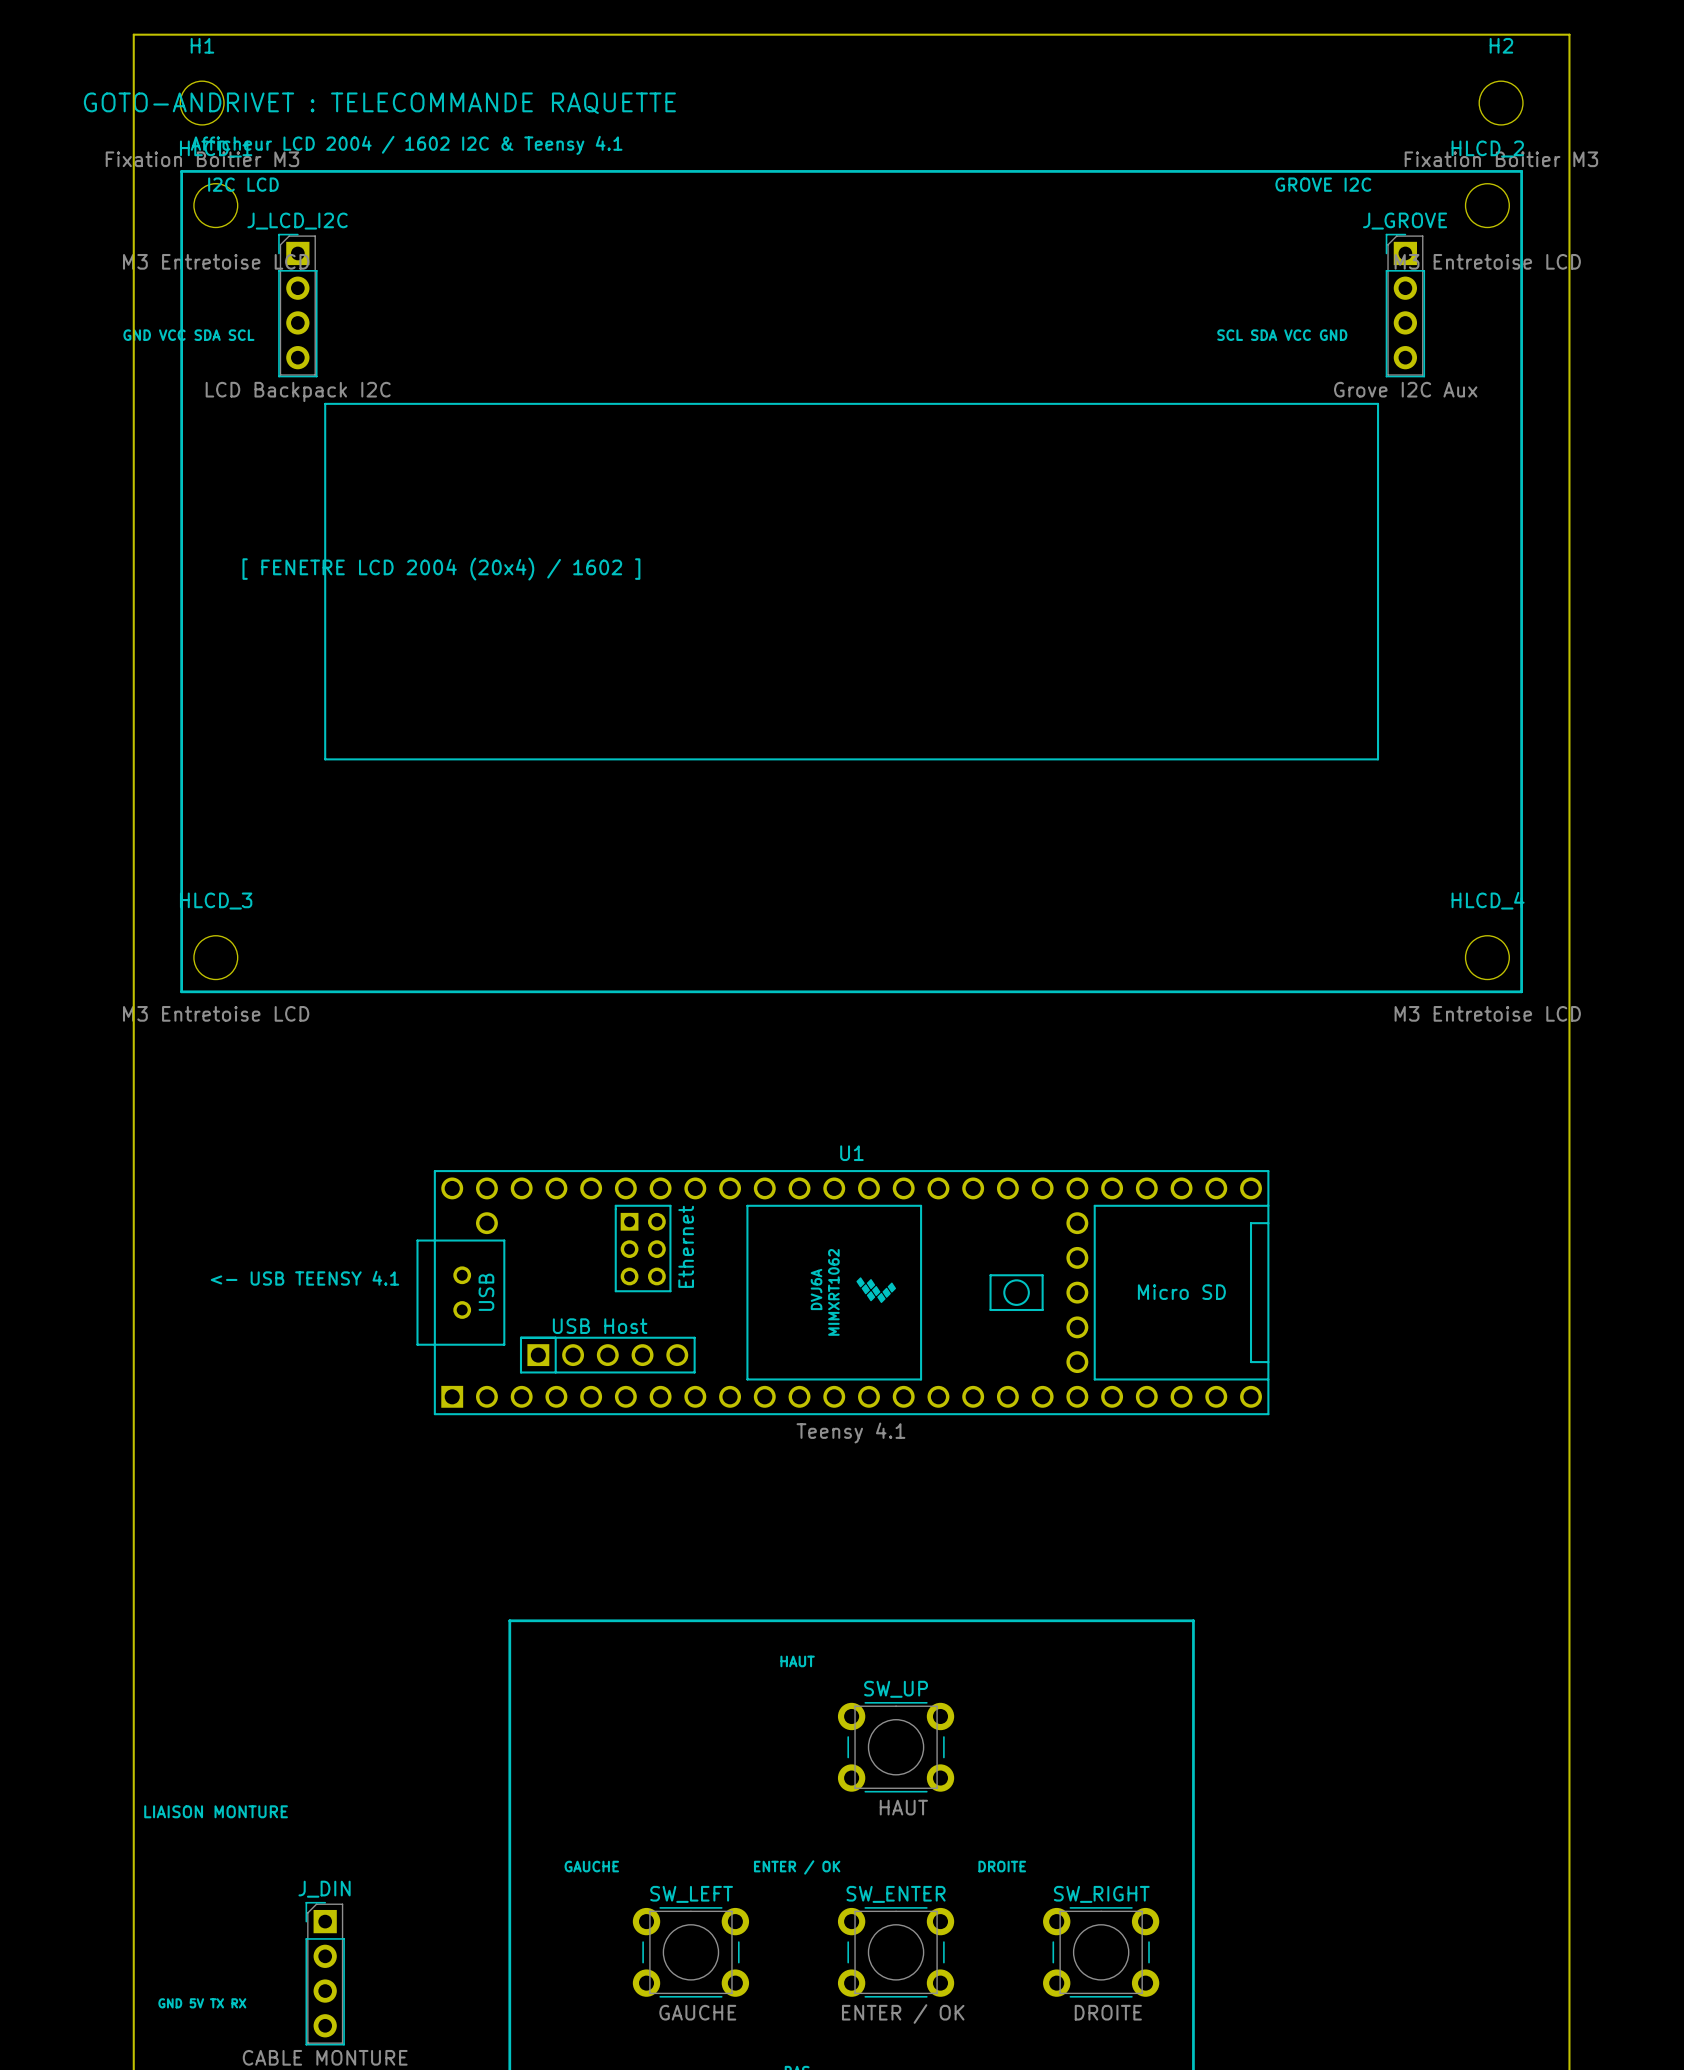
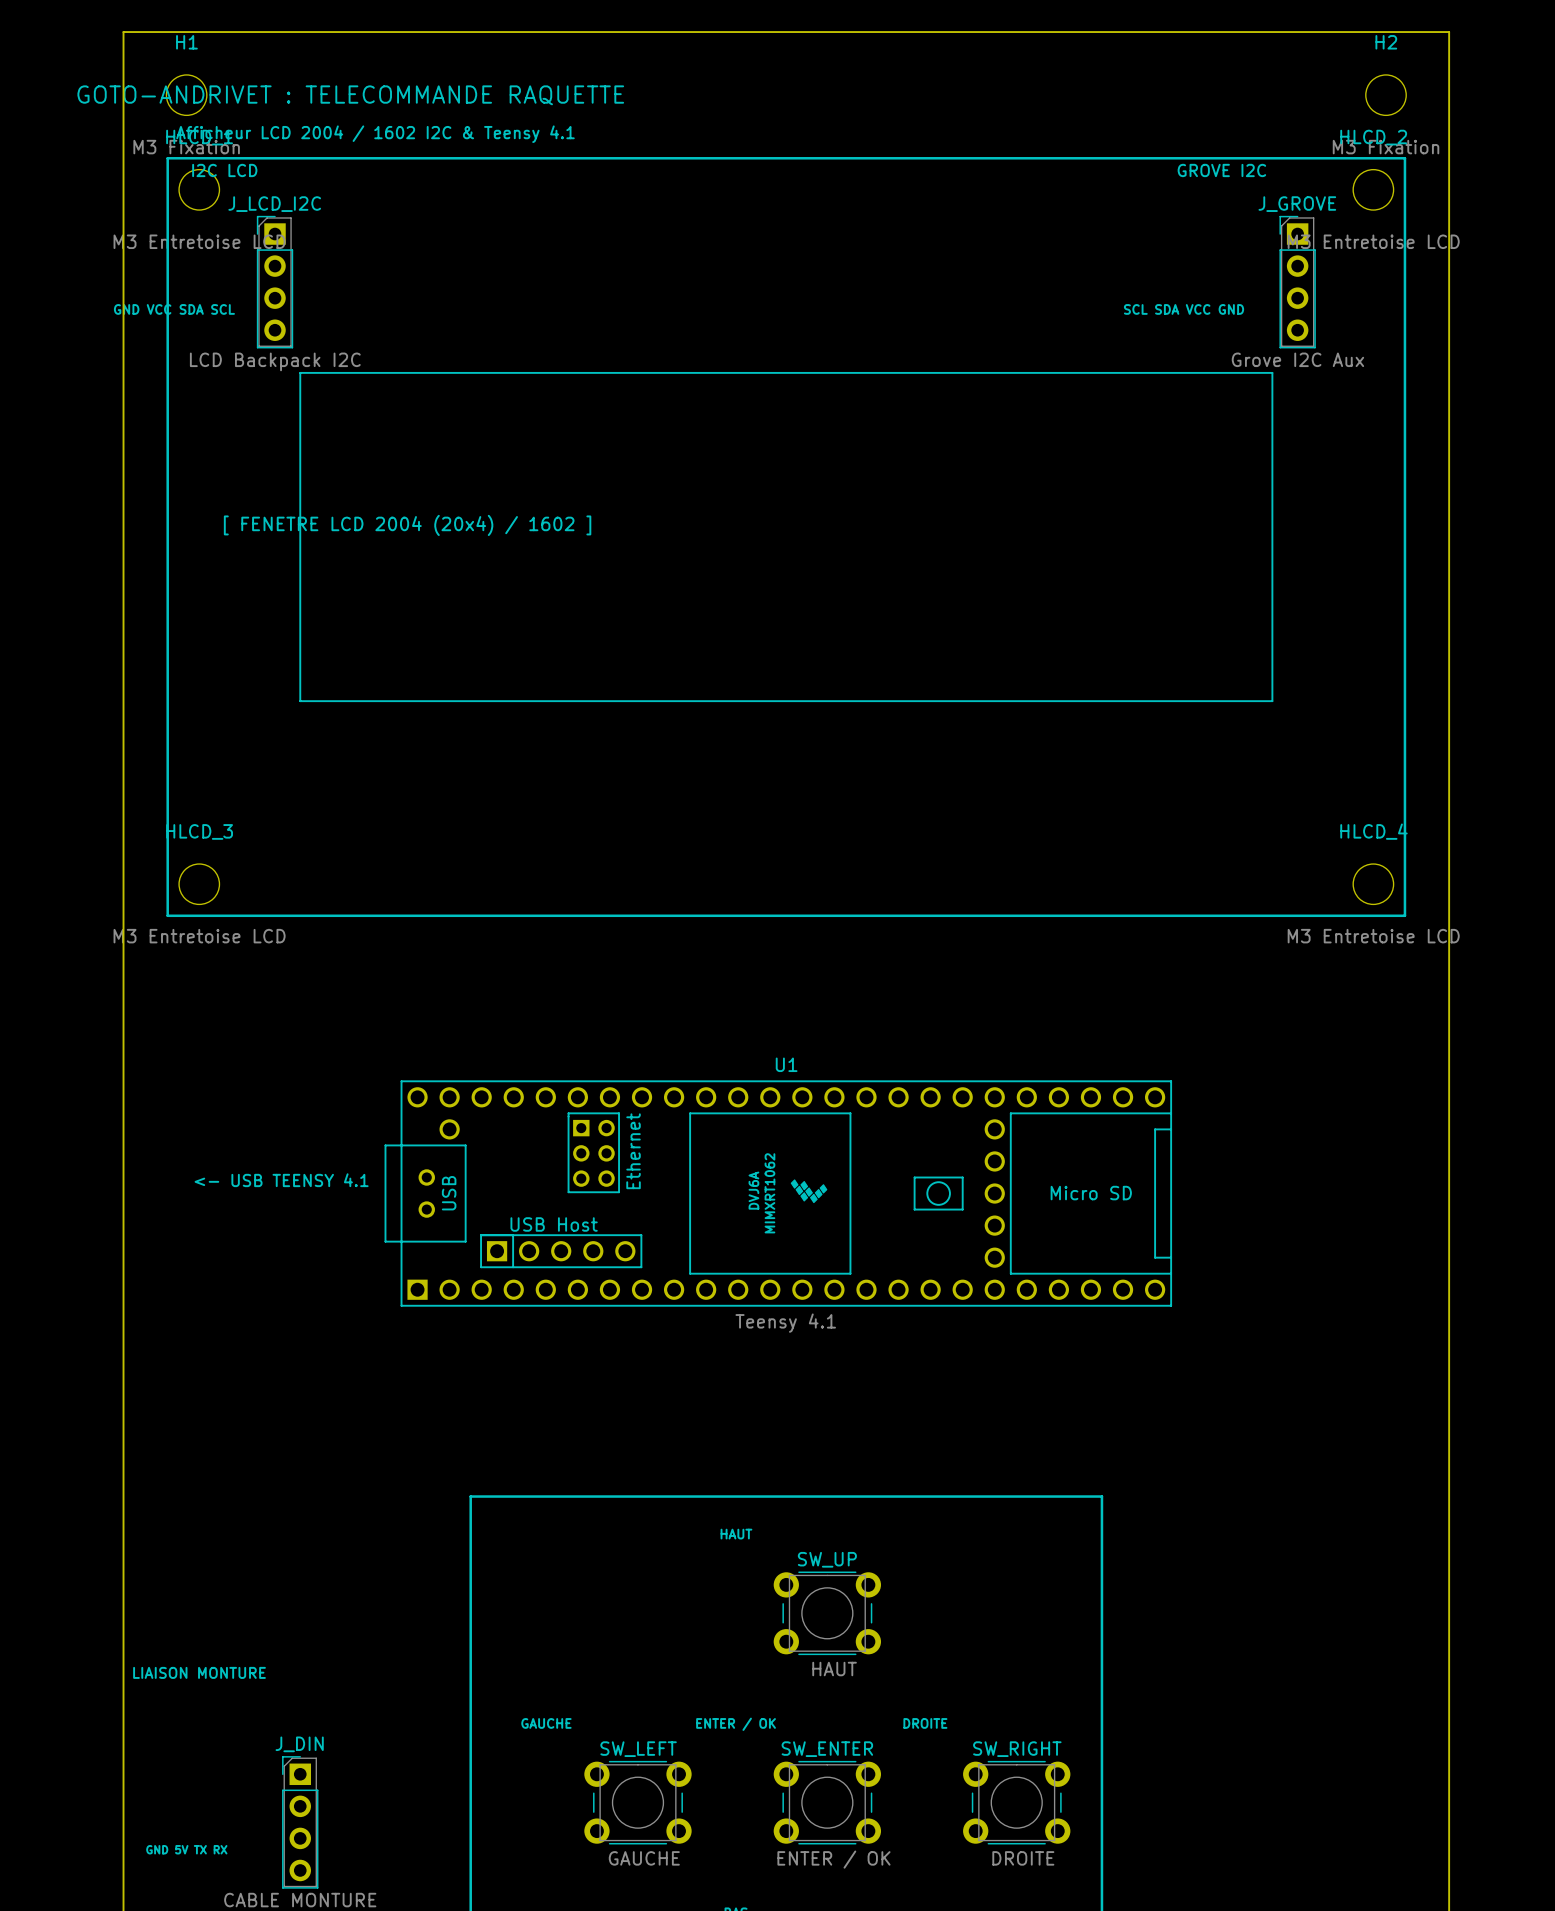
H1 value: Fixation Boitier M3 (202, 159) -> M3 Fixation (186, 147)
H2 value: Fixation Boitier M3 (1501, 159) -> M3 Fixation (1386, 147)

